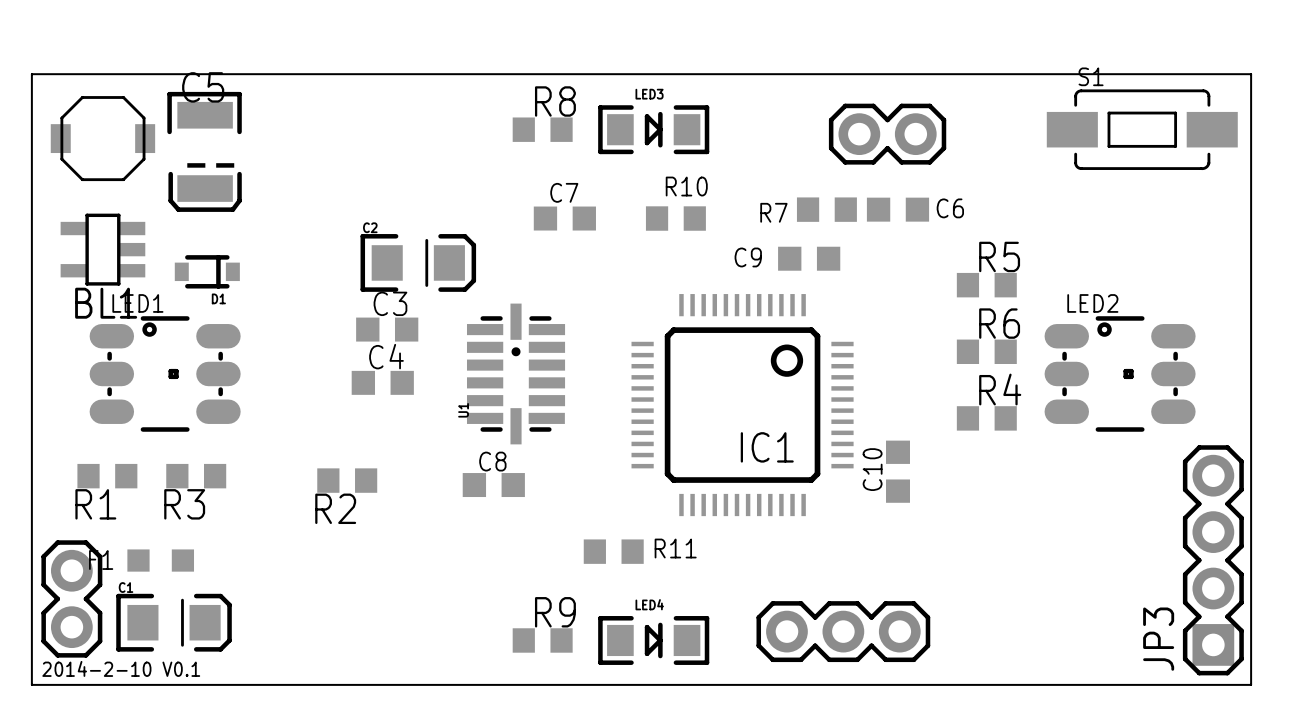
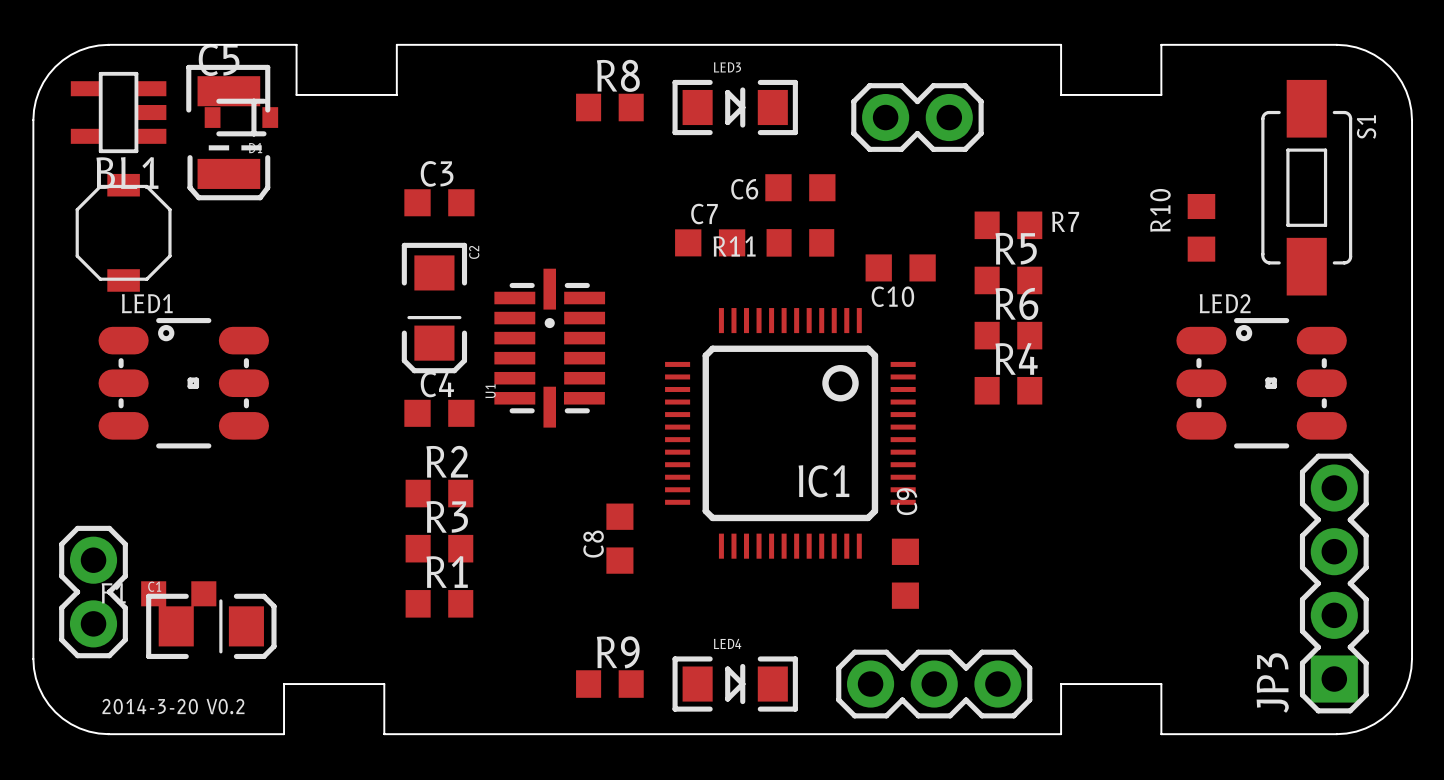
board edge: (98, 74) (31, 74) (31, 140) -> (108, 44) (79, 50) (55, 66) (39, 91) (33, 120)
board edge: (265, 74) (353, 74) -> (296, 44) (296, 94) (396, 94) (396, 44)
board edge: (942, 74) (1031, 74) -> (1061, 44) (1061, 94) (1161, 94) (1161, 44)
board edge: (1186, 74) (1251, 74) (1251, 684) (1186, 684) -> (1336, 44) (1365, 50) (1389, 66) (1406, 91) (1412, 120) (1411, 668) (1401, 696) (1382, 718) (1356, 731) (1336, 734)
S1 rotation: 0° (1142, 129) -> 90° clockwise (1306, 187)
part position: (887, 134) -> (917, 117)
part rotation: 0° (102, 138) -> 90° clockwise (123, 232)
part position: (102, 138) -> (123, 232)
R10 name position: R10 (686, 186) -> R10 (1160, 210)
C6 name position: C6 (950, 208) -> C6 (744, 189)
R7 position: (826, 209) -> (1008, 225)
C6 position: (898, 209) -> (800, 187)
R7 name position: R7 (773, 212) -> R7 (1065, 221)
C7 position: (564, 218) -> (710, 242)
R10 rotation: 0° (675, 218) -> 90° clockwise (1201, 227)
R10 position: (675, 218) -> (1201, 227)
BL1 position: (102, 249) -> (118, 112)
C9 rotation: 0° (809, 258) -> 90° clockwise (905, 573)
C9 position: (809, 258) -> (905, 573)
C2 rotation: 0° (418, 262) -> 90° clockwise (434, 308)
D1 position: (207, 271) -> (241, 117)
R5 position: (986, 285) -> (1008, 280)
C3 position: (387, 329) -> (439, 202)
R6 position: (986, 351) -> (1008, 335)
U1 position: (516, 373) -> (549, 348)
C4 position: (382, 382) -> (439, 413)
IC1 position: (742, 405) -> (790, 433)
R4 position: (986, 418) -> (1008, 390)
C10 rotation: 0° (898, 471) -> 90° clockwise (900, 267)
C10 position: (898, 471) -> (900, 267)
R1 position: (107, 476) -> (439, 603)
R3 position: (196, 476) -> (439, 548)
R2 position: (347, 480) -> (439, 493)
C8 rotation: 0° (493, 485) -> 90° clockwise (619, 538)
C8 position: (493, 485) -> (619, 538)
R1 name position: R1 (95, 504) -> R1 (447, 571)
R3 name position: R3 (184, 504) -> R3 (447, 516)
R2 name position: R2 (335, 508) -> R2 (447, 461)
R11 name position: R11 (675, 548) -> R11 (734, 246)
R11 position: (613, 551) -> (800, 242)
JP3 position: (1213, 560) -> (1334, 583)
part position: (71, 598) -> (93, 592)
board edge: (31, 618) (31, 684) (98, 684) -> (33, 658) (39, 687) (55, 712) (79, 728) (108, 734)
C1 position: (174, 622) -> (211, 626)
part position: (843, 631) -> (934, 684)
text: 2014-2-10 V0.1 (121, 668) -> 2014-3-20 V0.2 (173, 706)
board edge: (253, 684) (342, 684) -> (284, 734) (284, 684) (384, 684) (384, 734)
board edge: (942, 684) (1031, 684) -> (1061, 734) (1061, 684) (1161, 684) (1161, 734)

